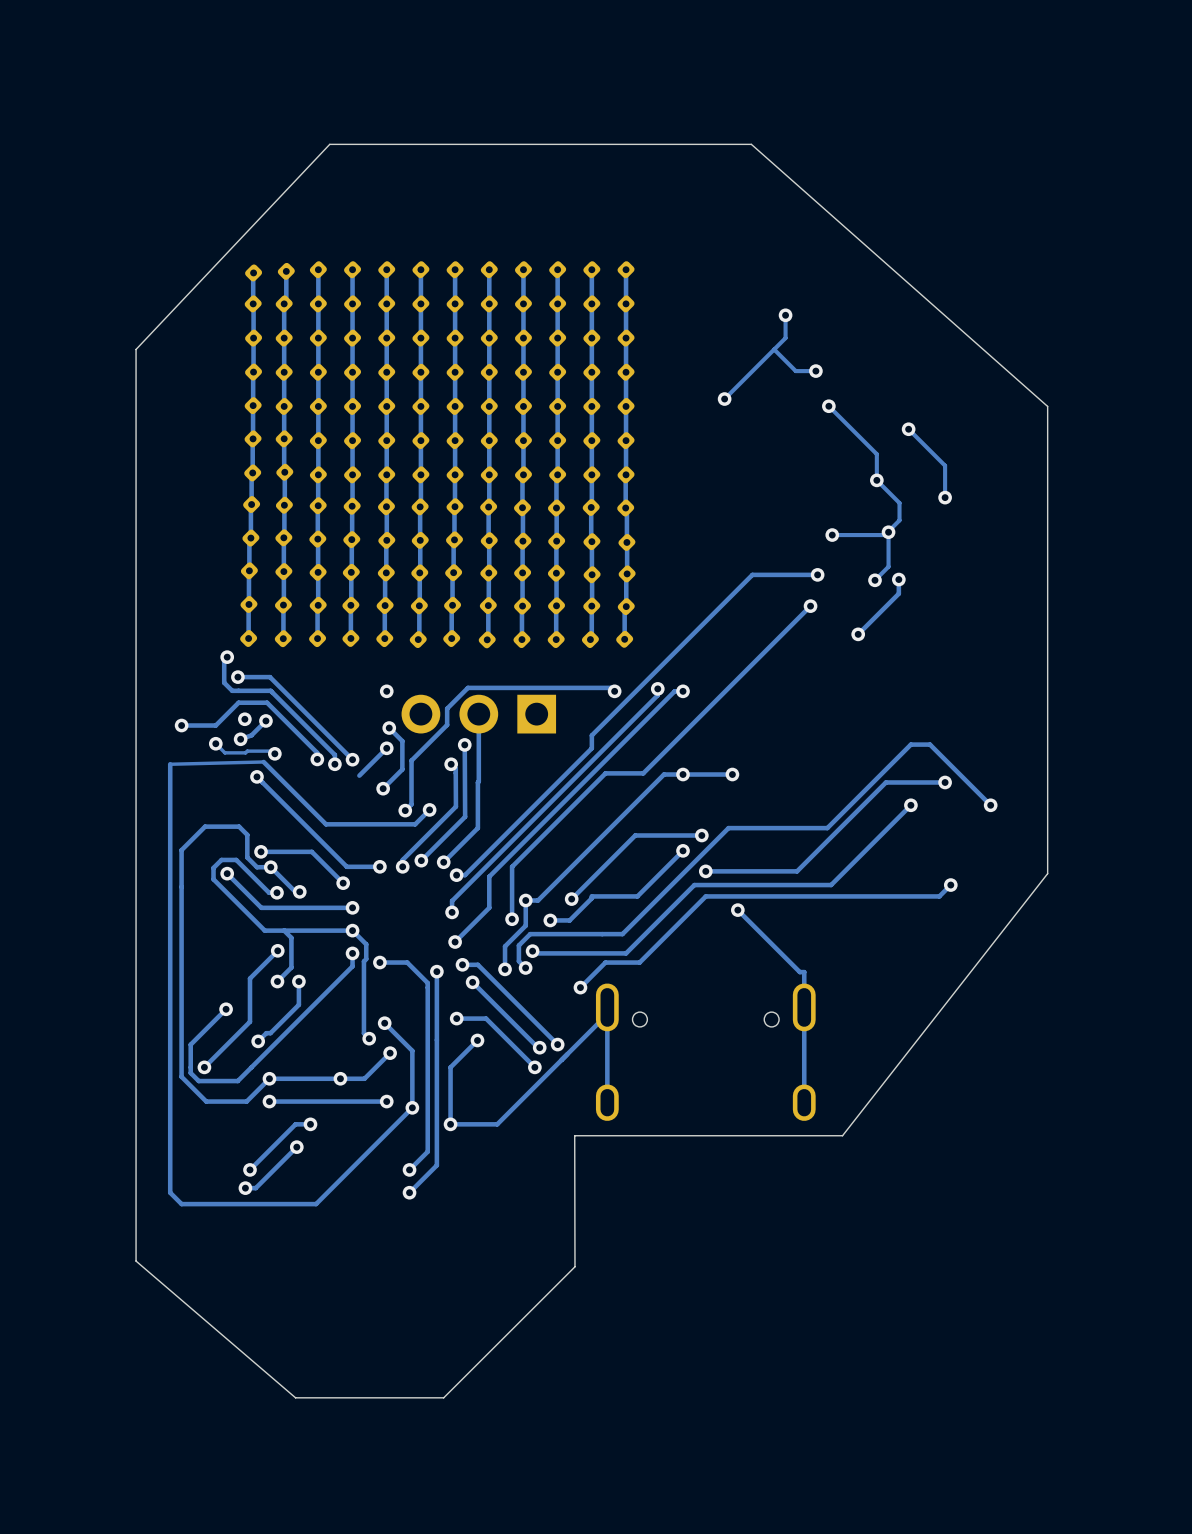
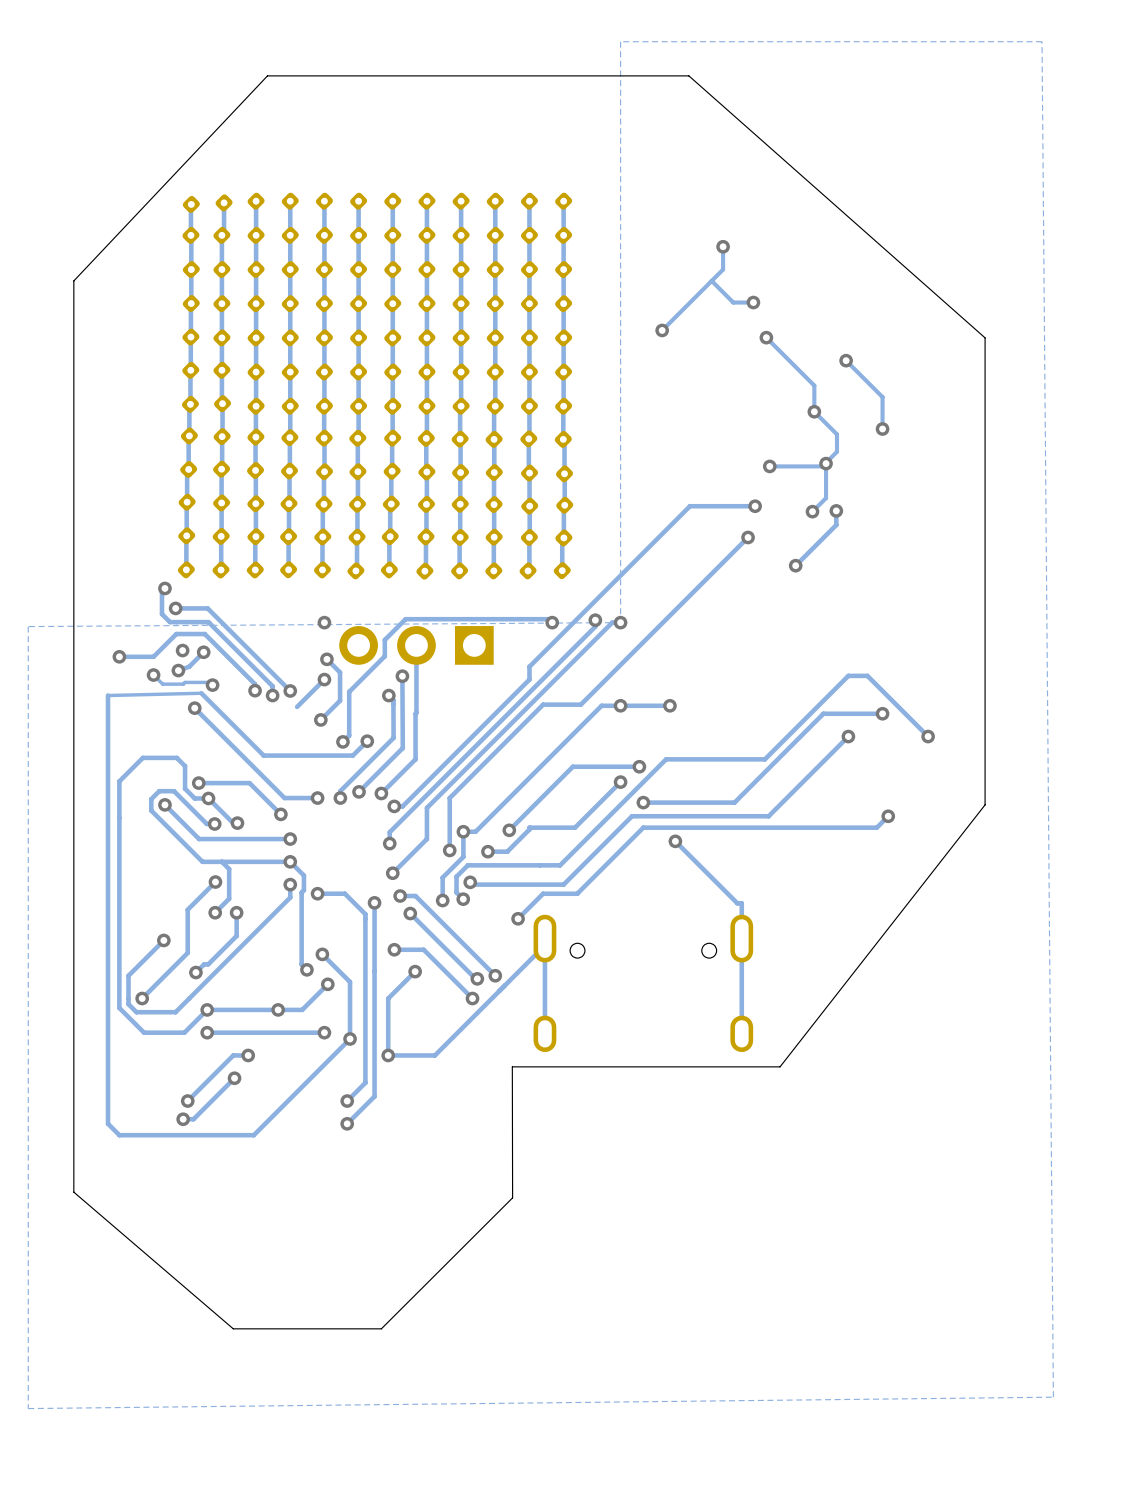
zone outline: none -> (1042, 41) (1053, 1397) (28, 1408) (28, 626) (620, 622) (620, 41) (1042, 41)

